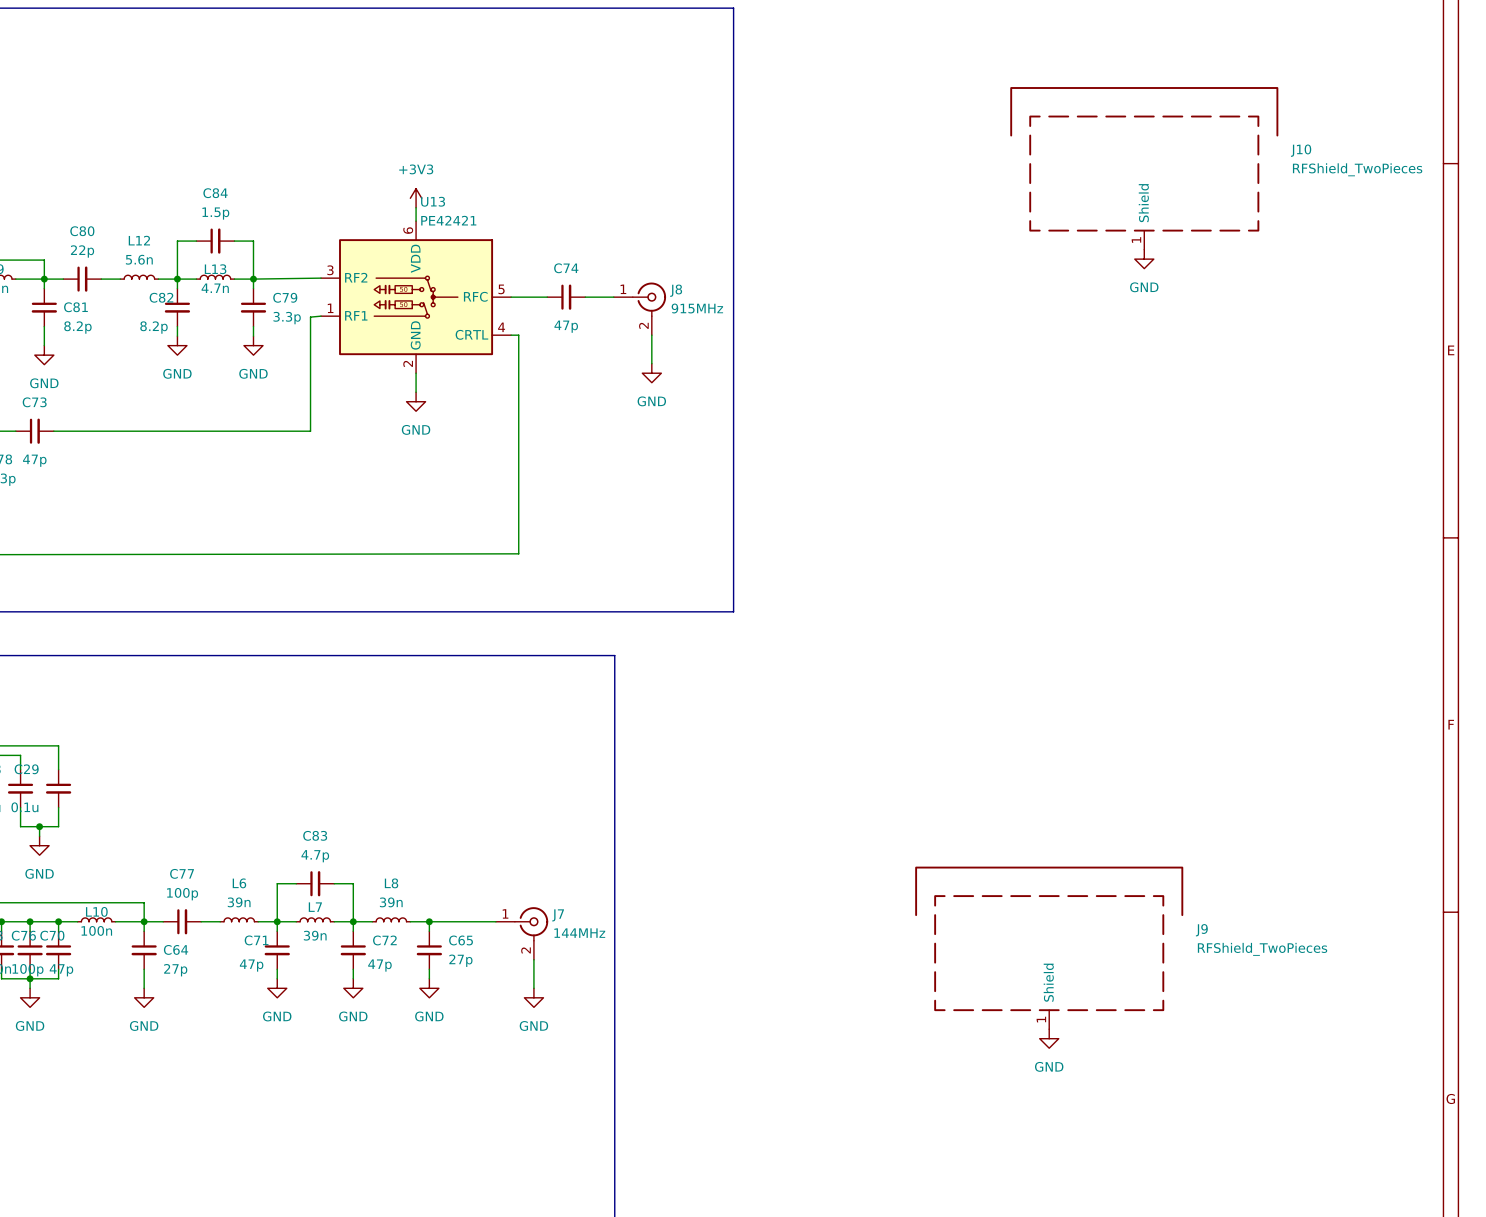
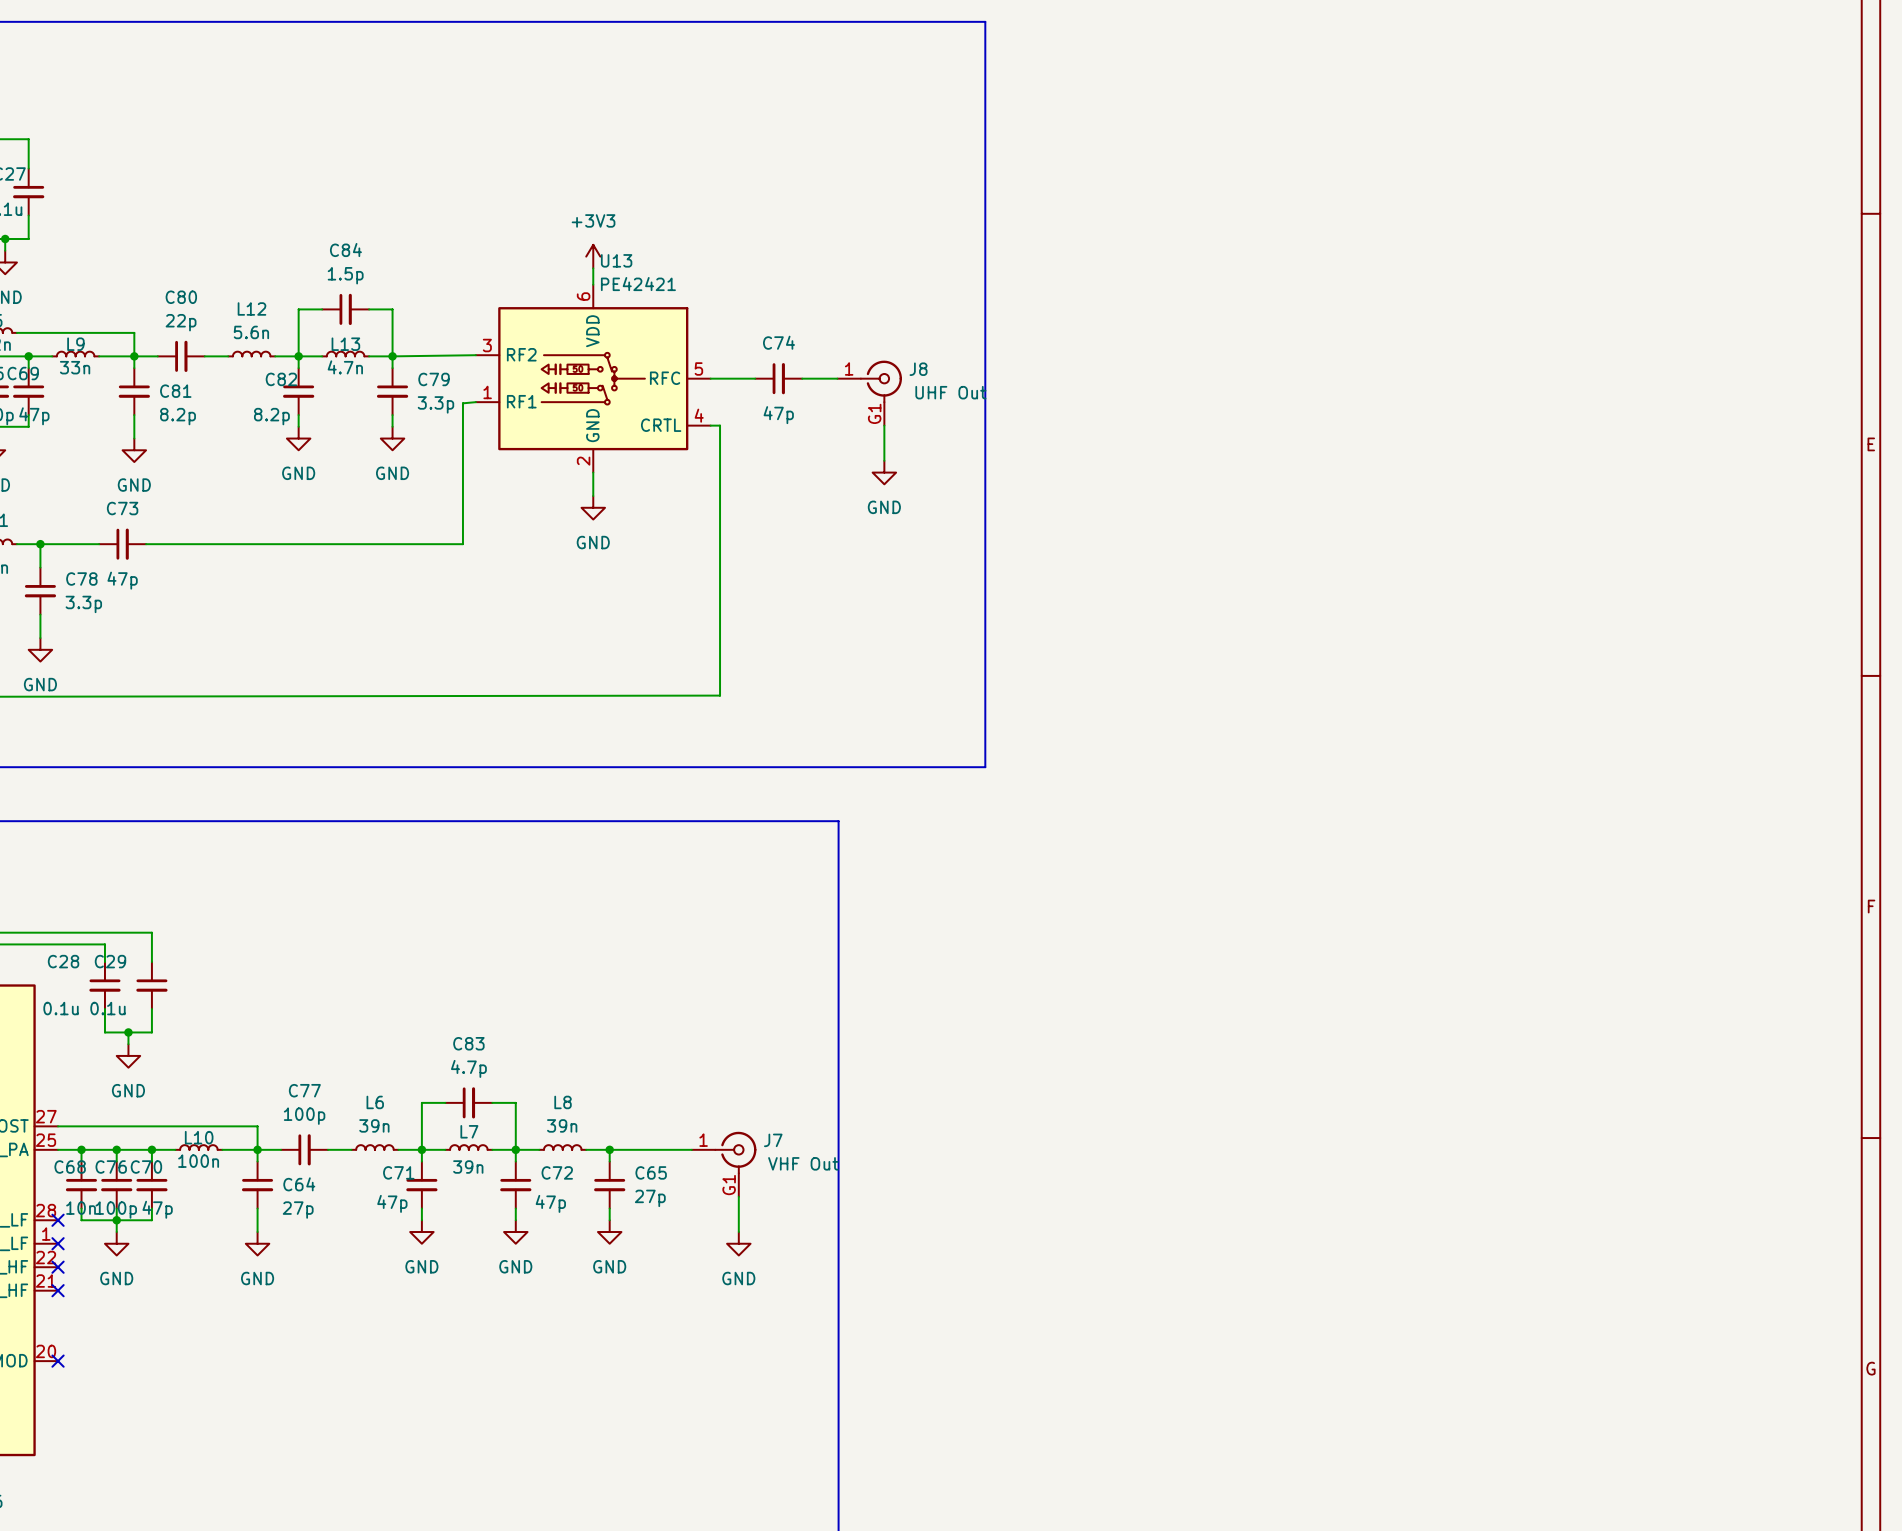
J10: RFShield_TwoPieces (1144, 168) -> none
power symbol: GND (1144, 259) -> none
J8 value: 915MHz (697, 308) -> UHF Out (950, 392)
J8 pin number: 2 (643, 325) -> G1 (874, 413)
J7 value: 144MHz (579, 933) -> VHF Out (803, 1163)
J9: RFShield_TwoPieces (1049, 947) -> none
J7 pin number: 2 (526, 950) -> G1 (729, 1185)
power symbol: GND (1049, 1038) -> none

